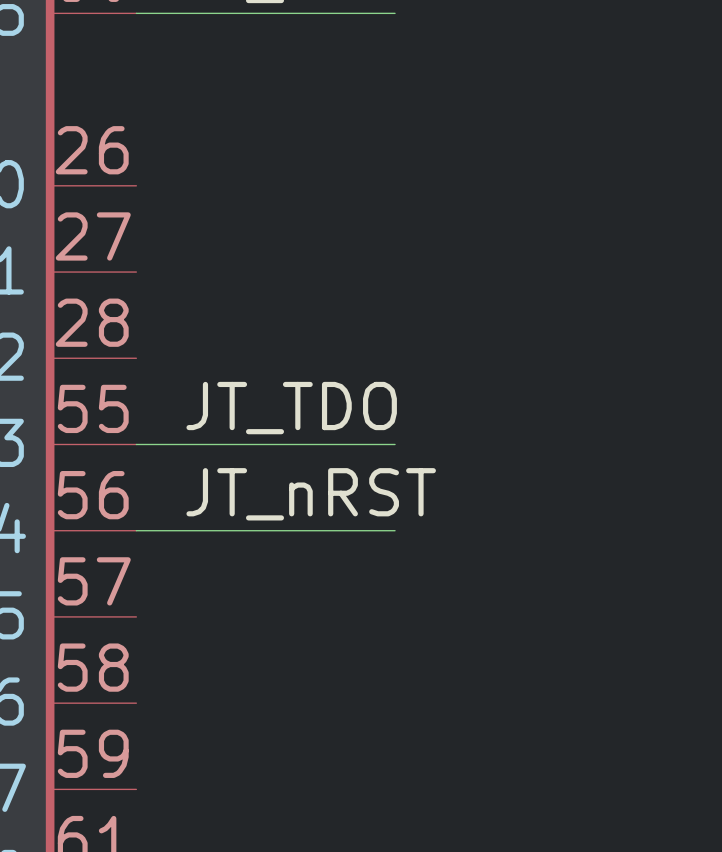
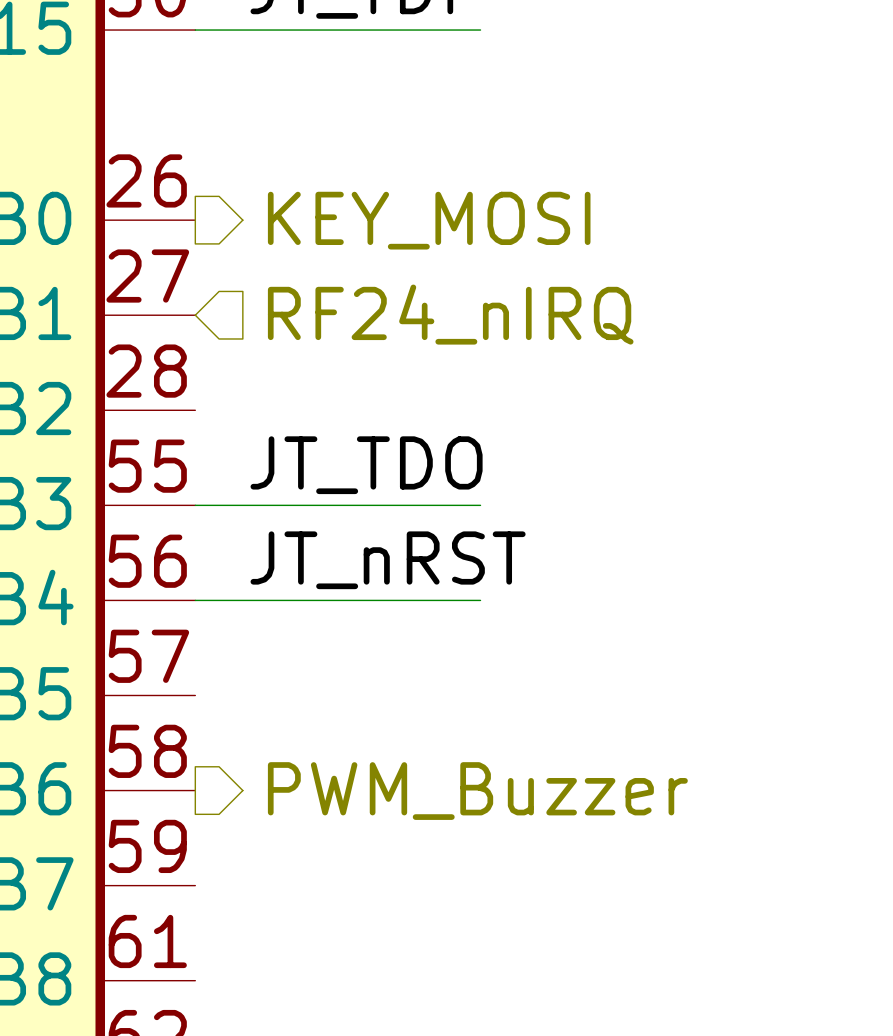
hierarchical label: none -> KEY_MOSI (429, 220)
hierarchical label: none -> RF24_nIRQ (450, 314)
hierarchical label: none -> PWM_Buzzer (477, 791)

